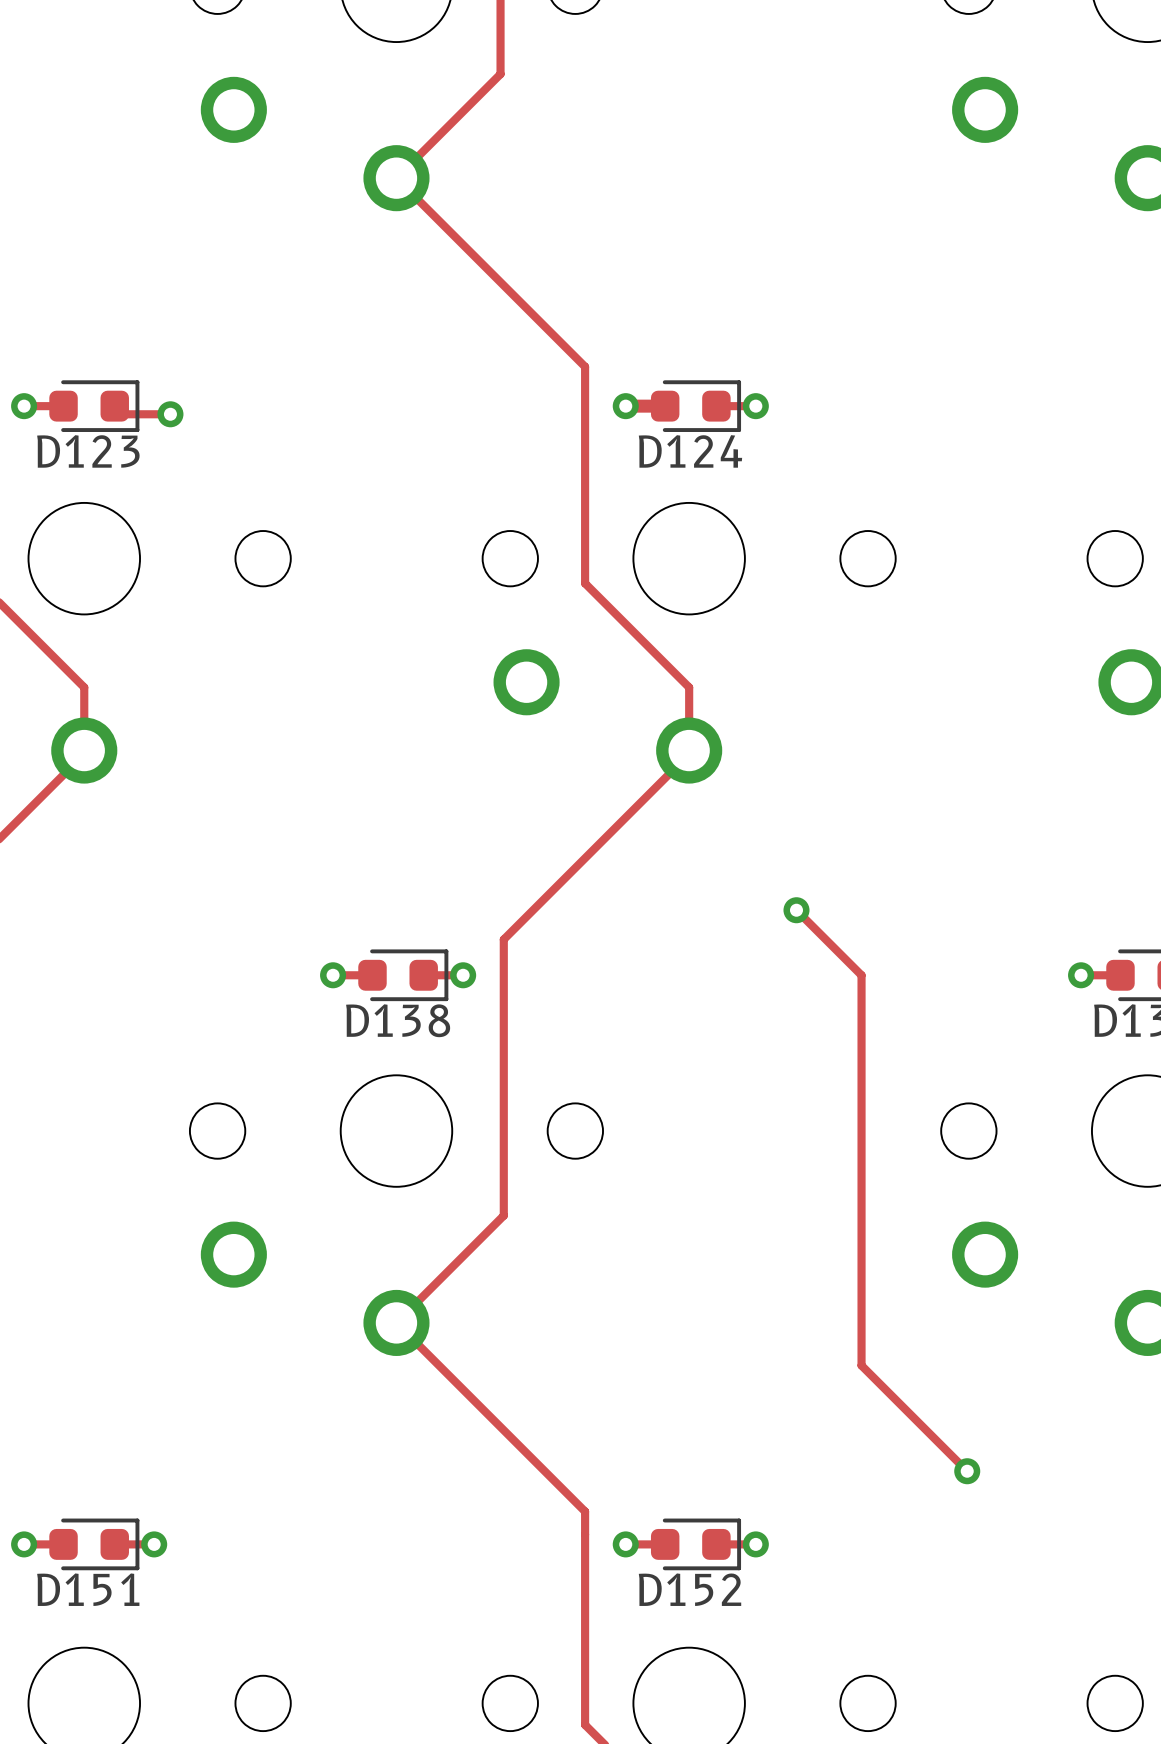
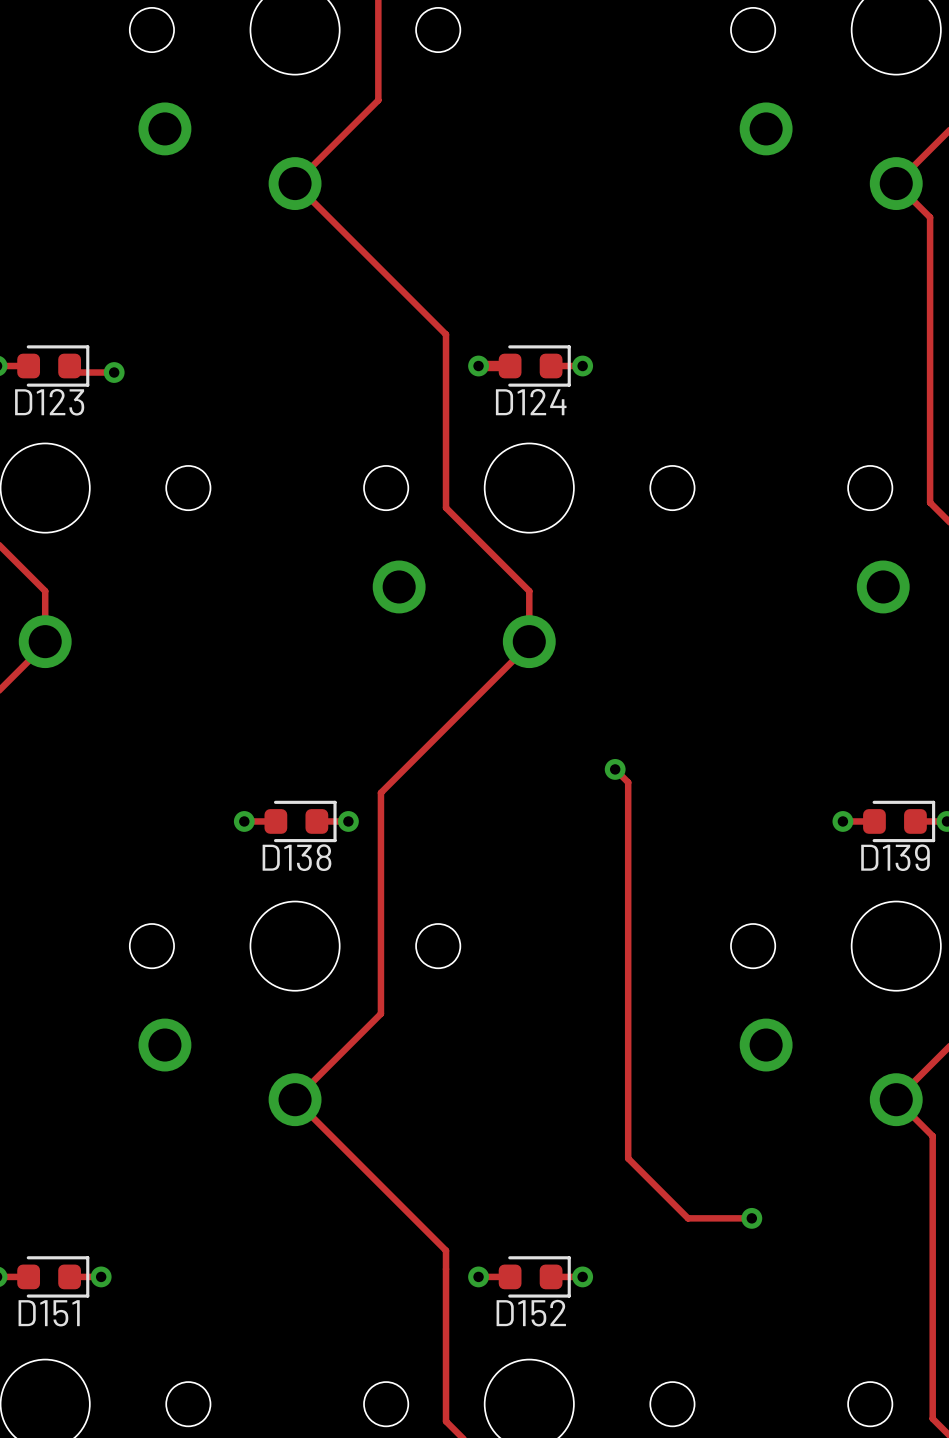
track: (812, 926) (861, 975) (861, 1365) (967, 1471) -> (628, 782) (628, 1158) (688, 1218) (751, 1218)

